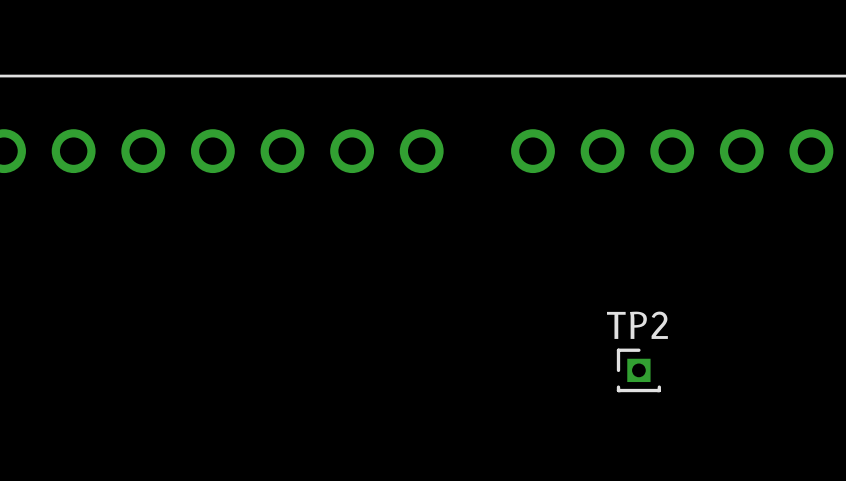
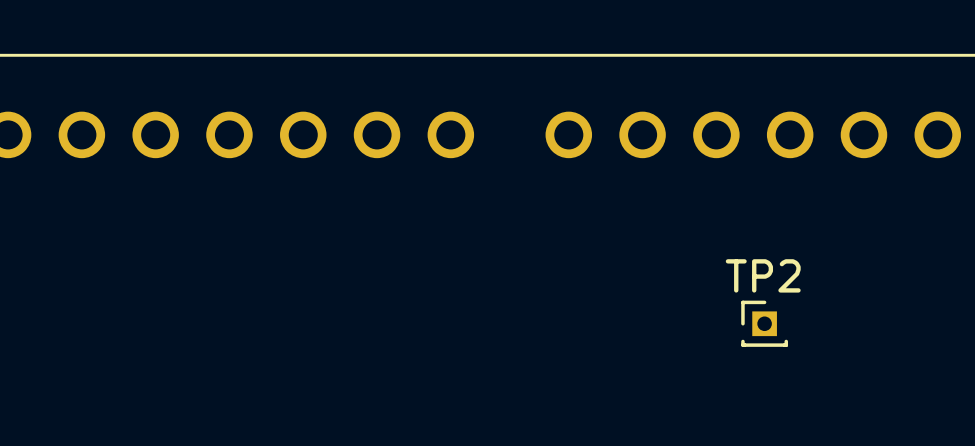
TP2 position: (638, 370) -> (764, 323)

